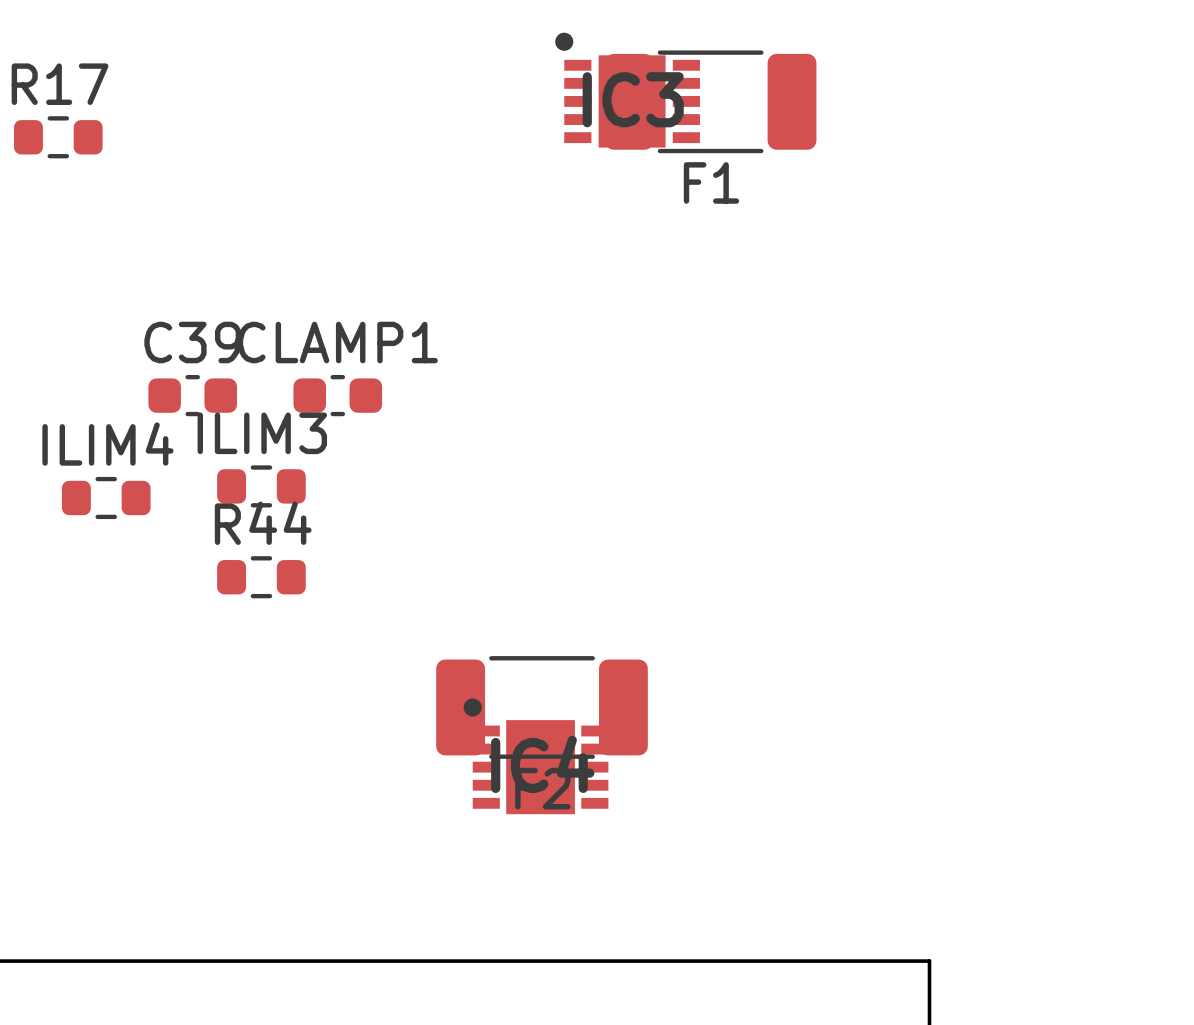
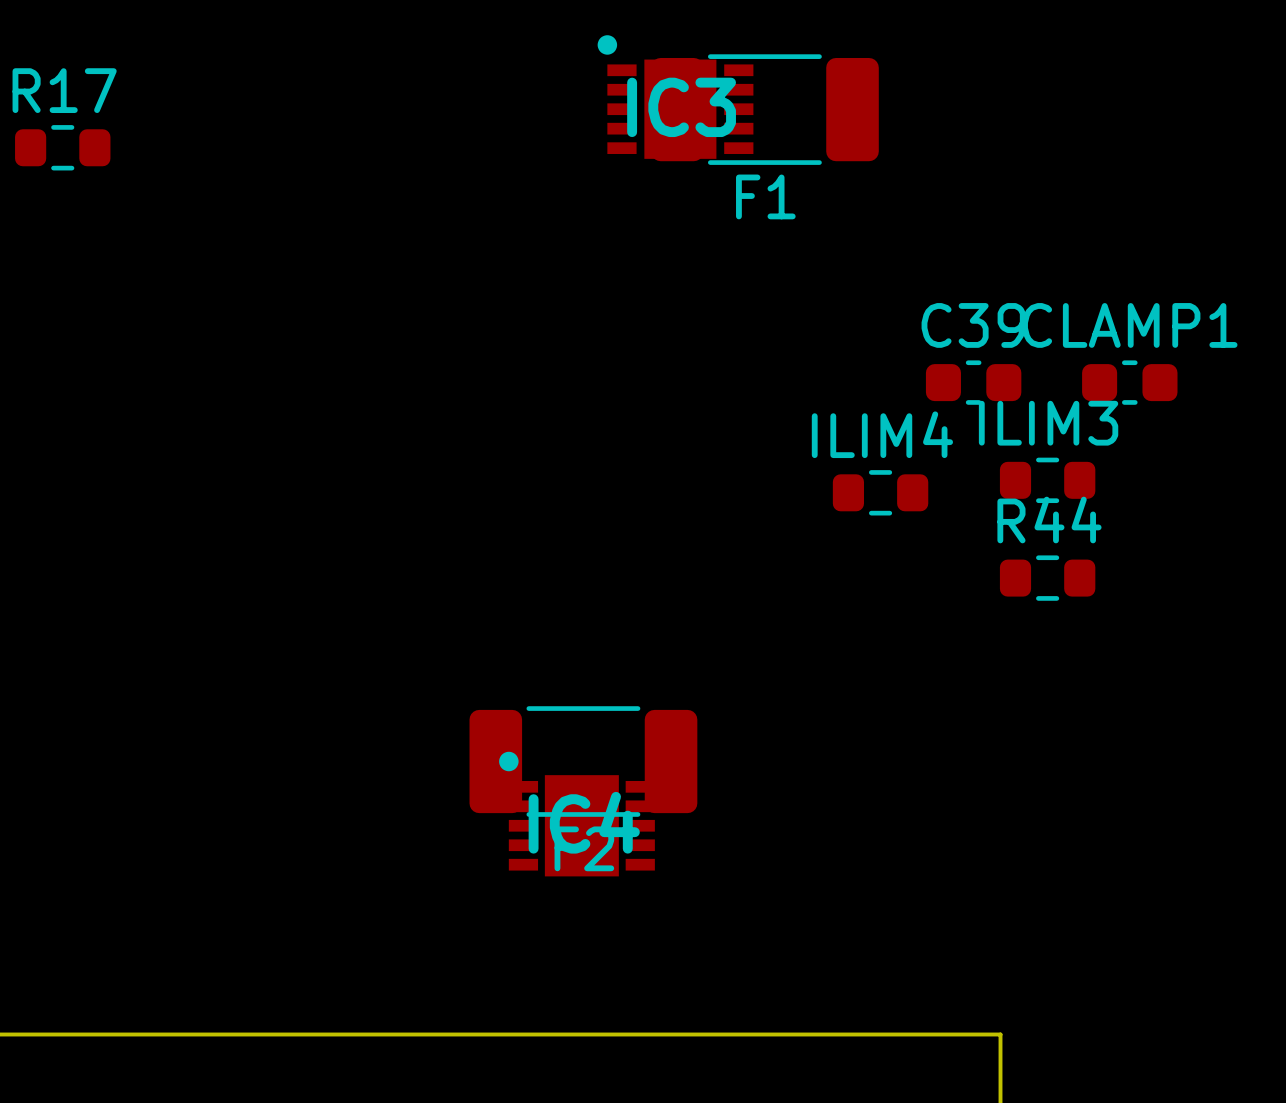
C39 position: (192, 395) -> (973, 382)
CLAMP1 position: (337, 395) -> (1129, 382)
ILIM3 position: (261, 486) -> (1047, 480)
ILIM4 position: (106, 497) -> (880, 492)
R44 position: (261, 577) -> (1047, 578)

